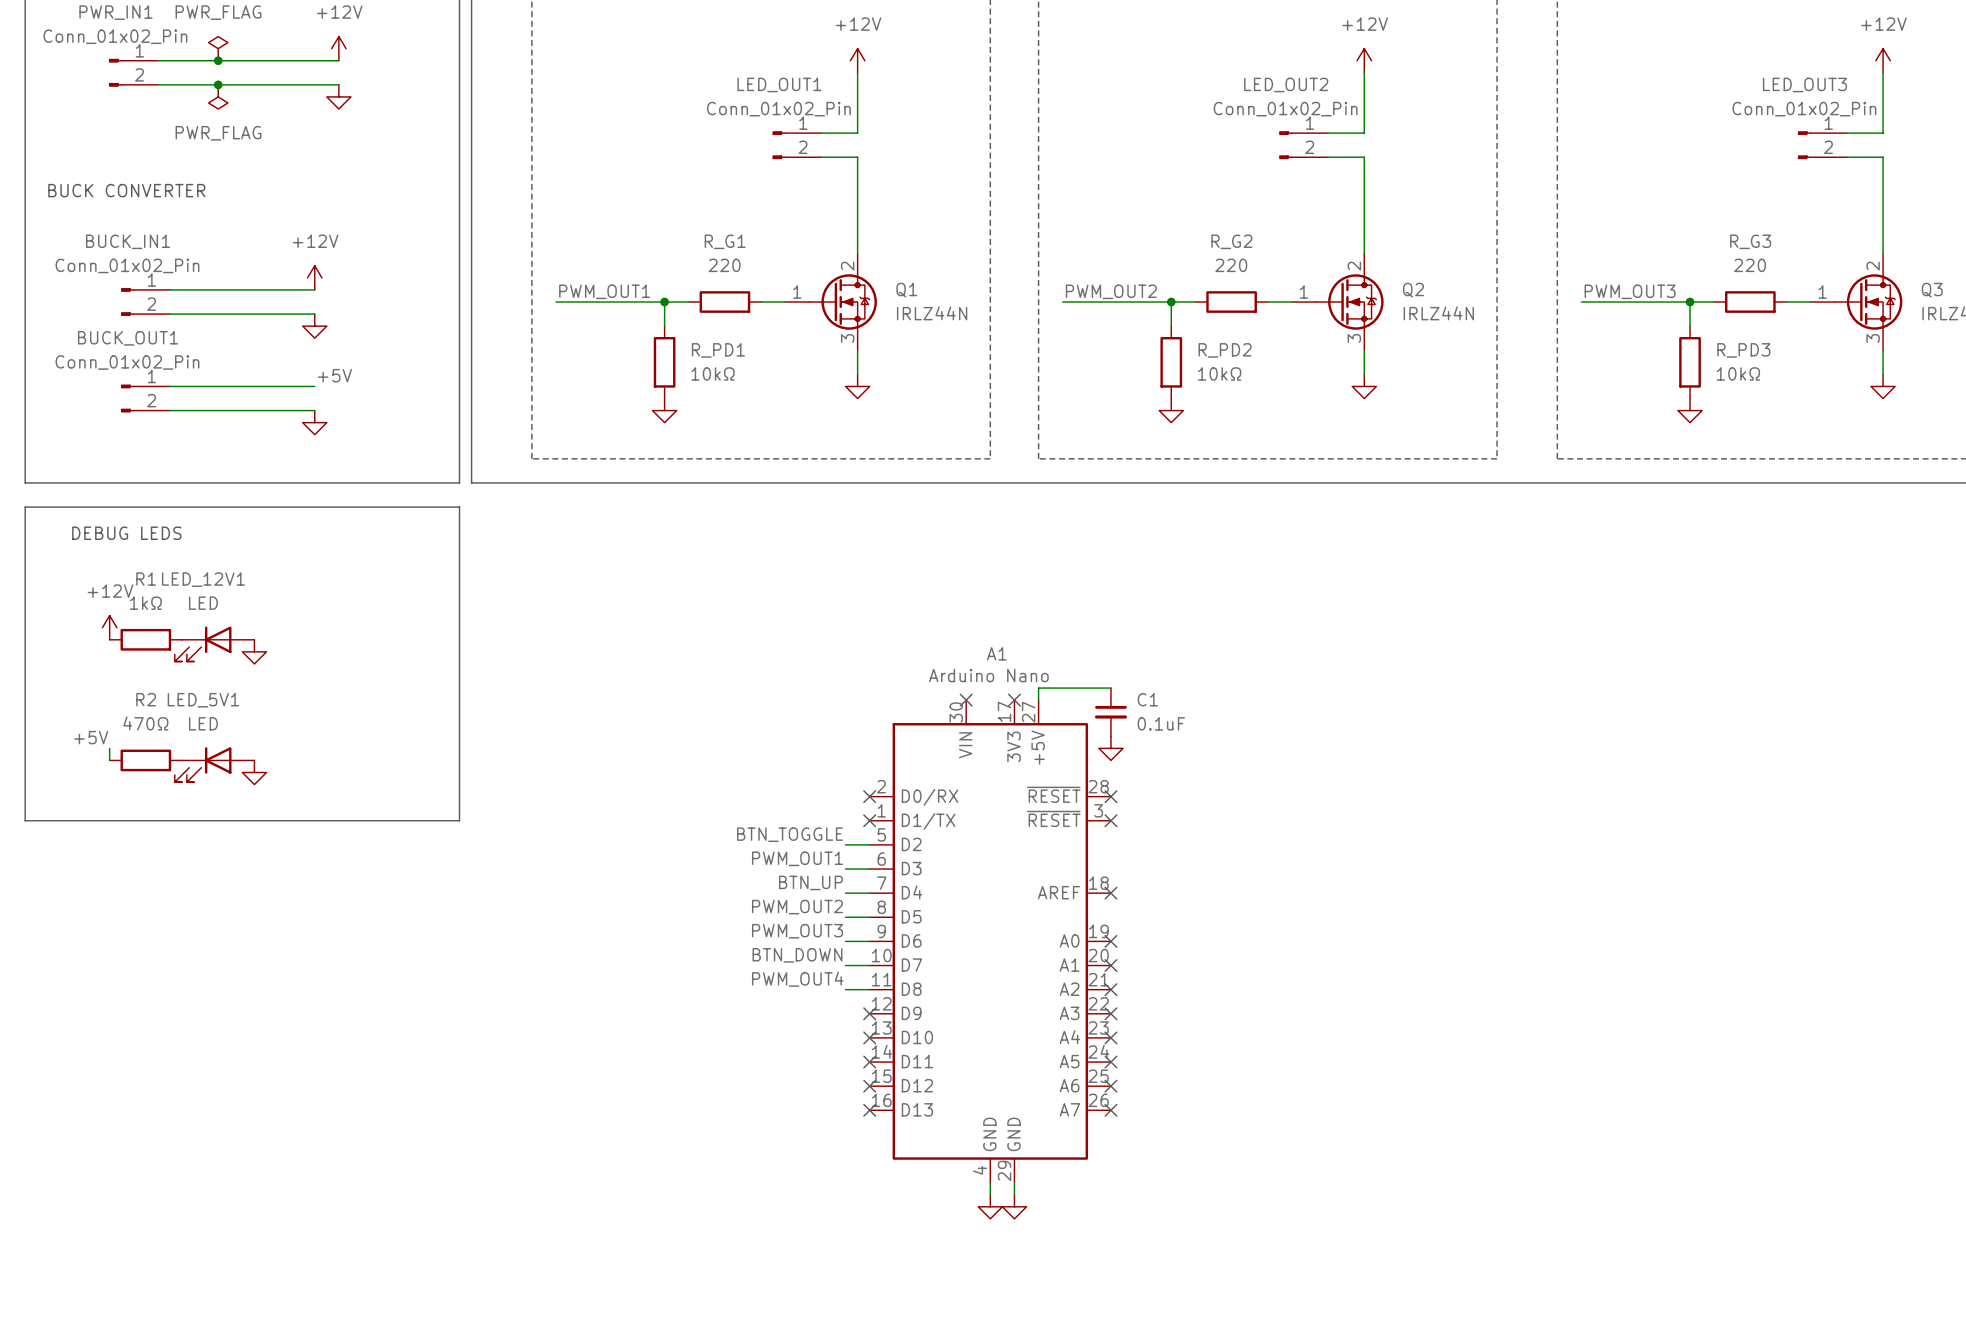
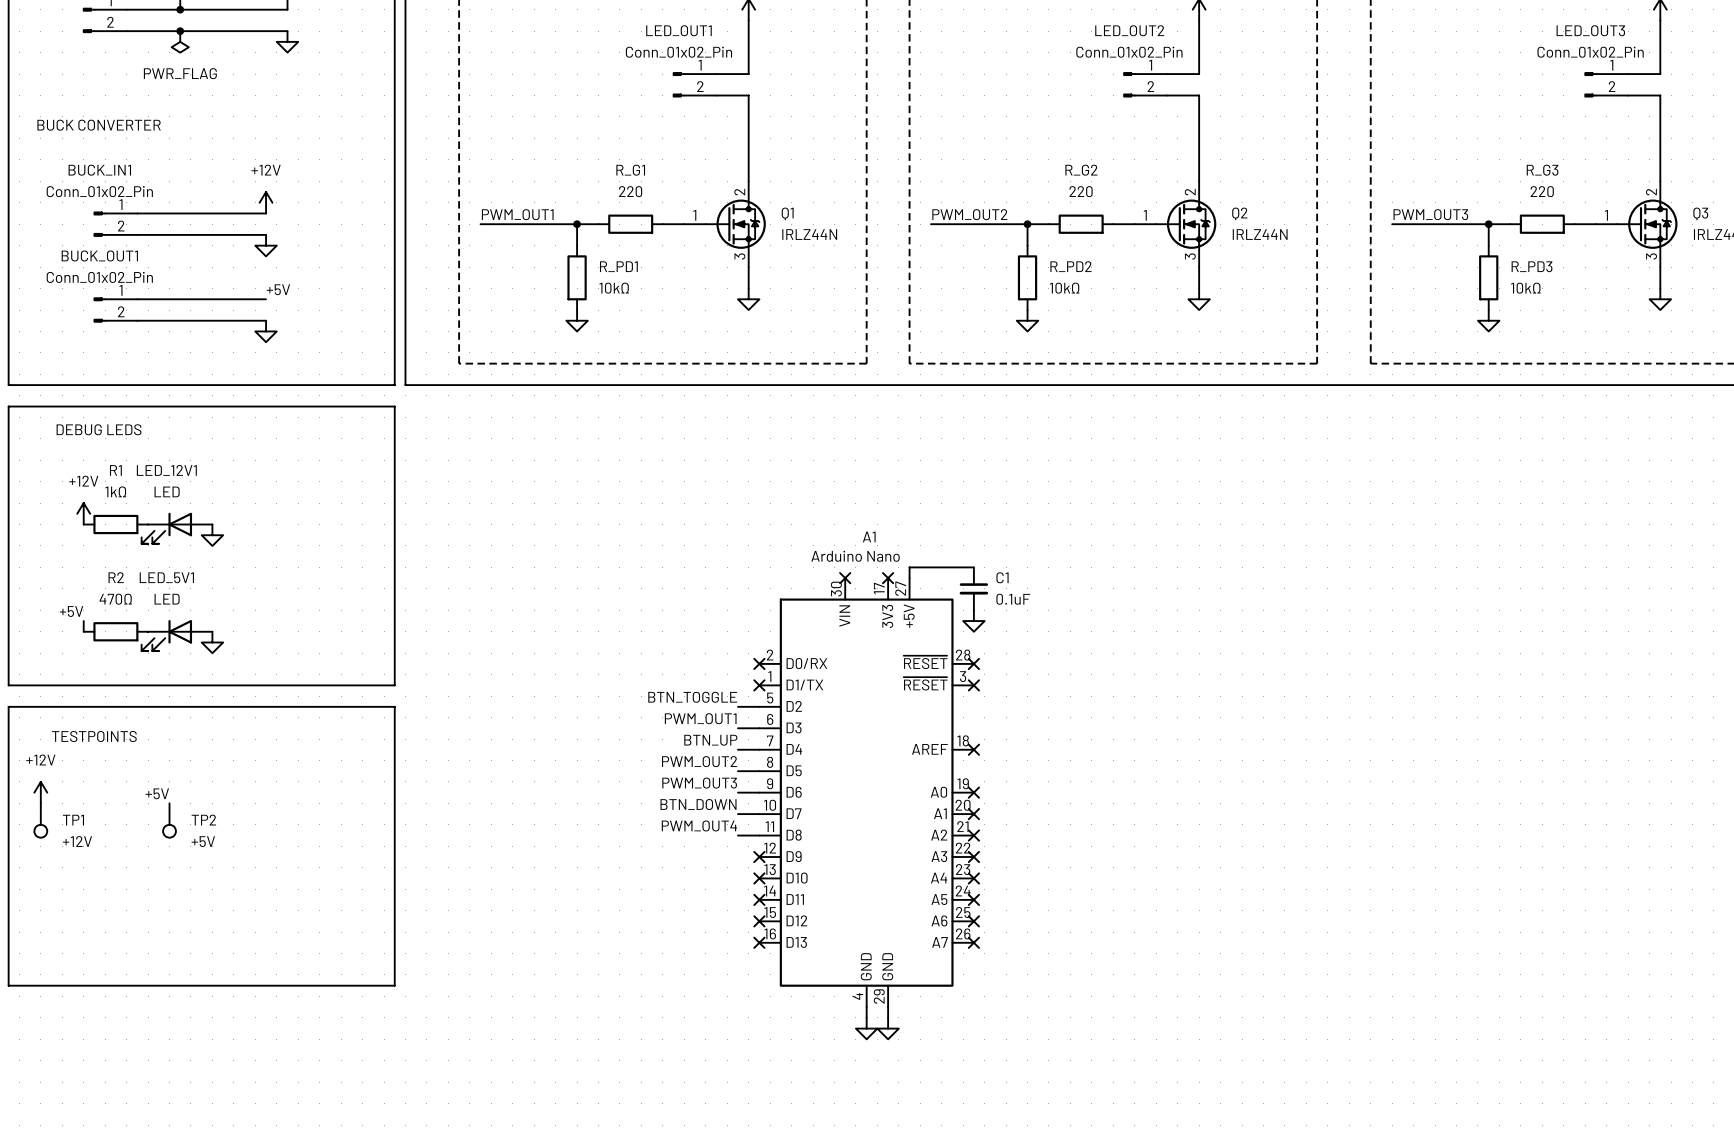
line: none -> (8, 706) (394, 706) (394, 985) (8, 985) (8, 706)
text: none -> TESTPOINTS (94, 736)
power symbol: none -> +12V (40, 792)
label: none -> +5V (157, 793)
TP1: none -> +12V (40, 820)
TP2: none -> +5V (169, 820)

